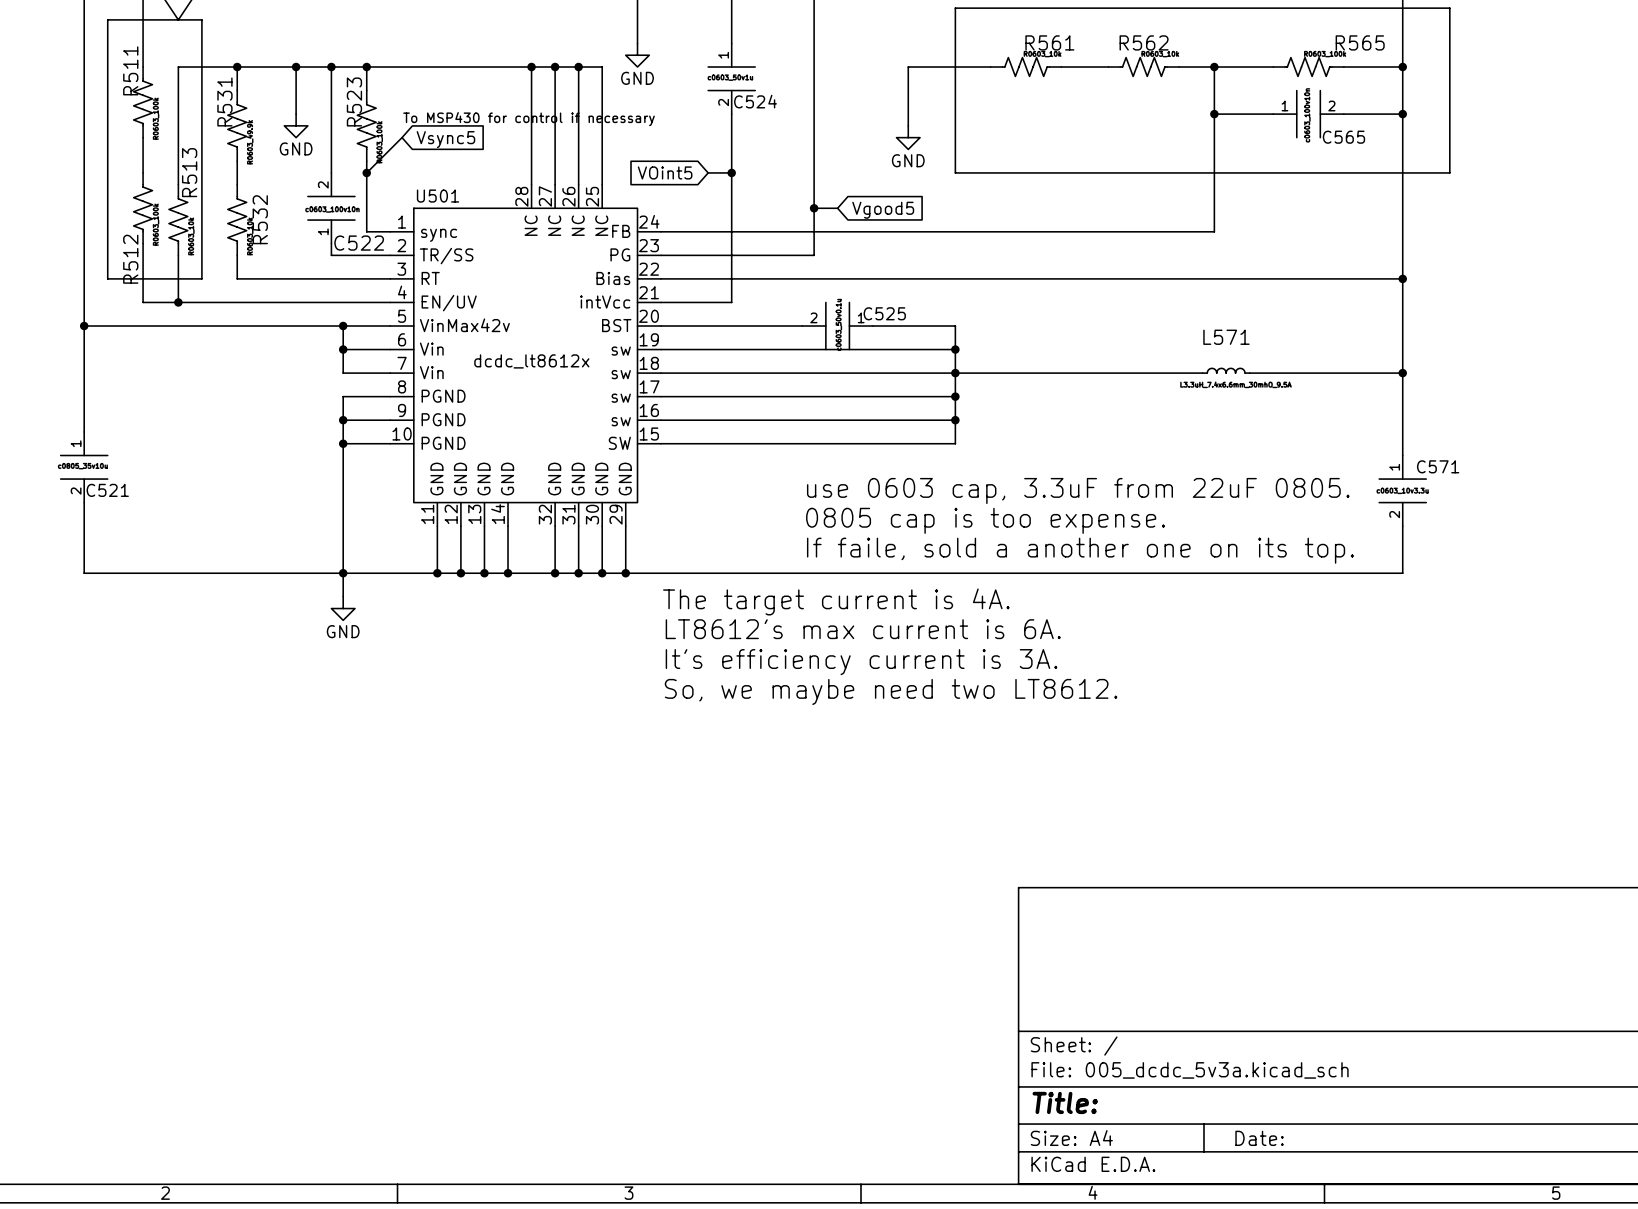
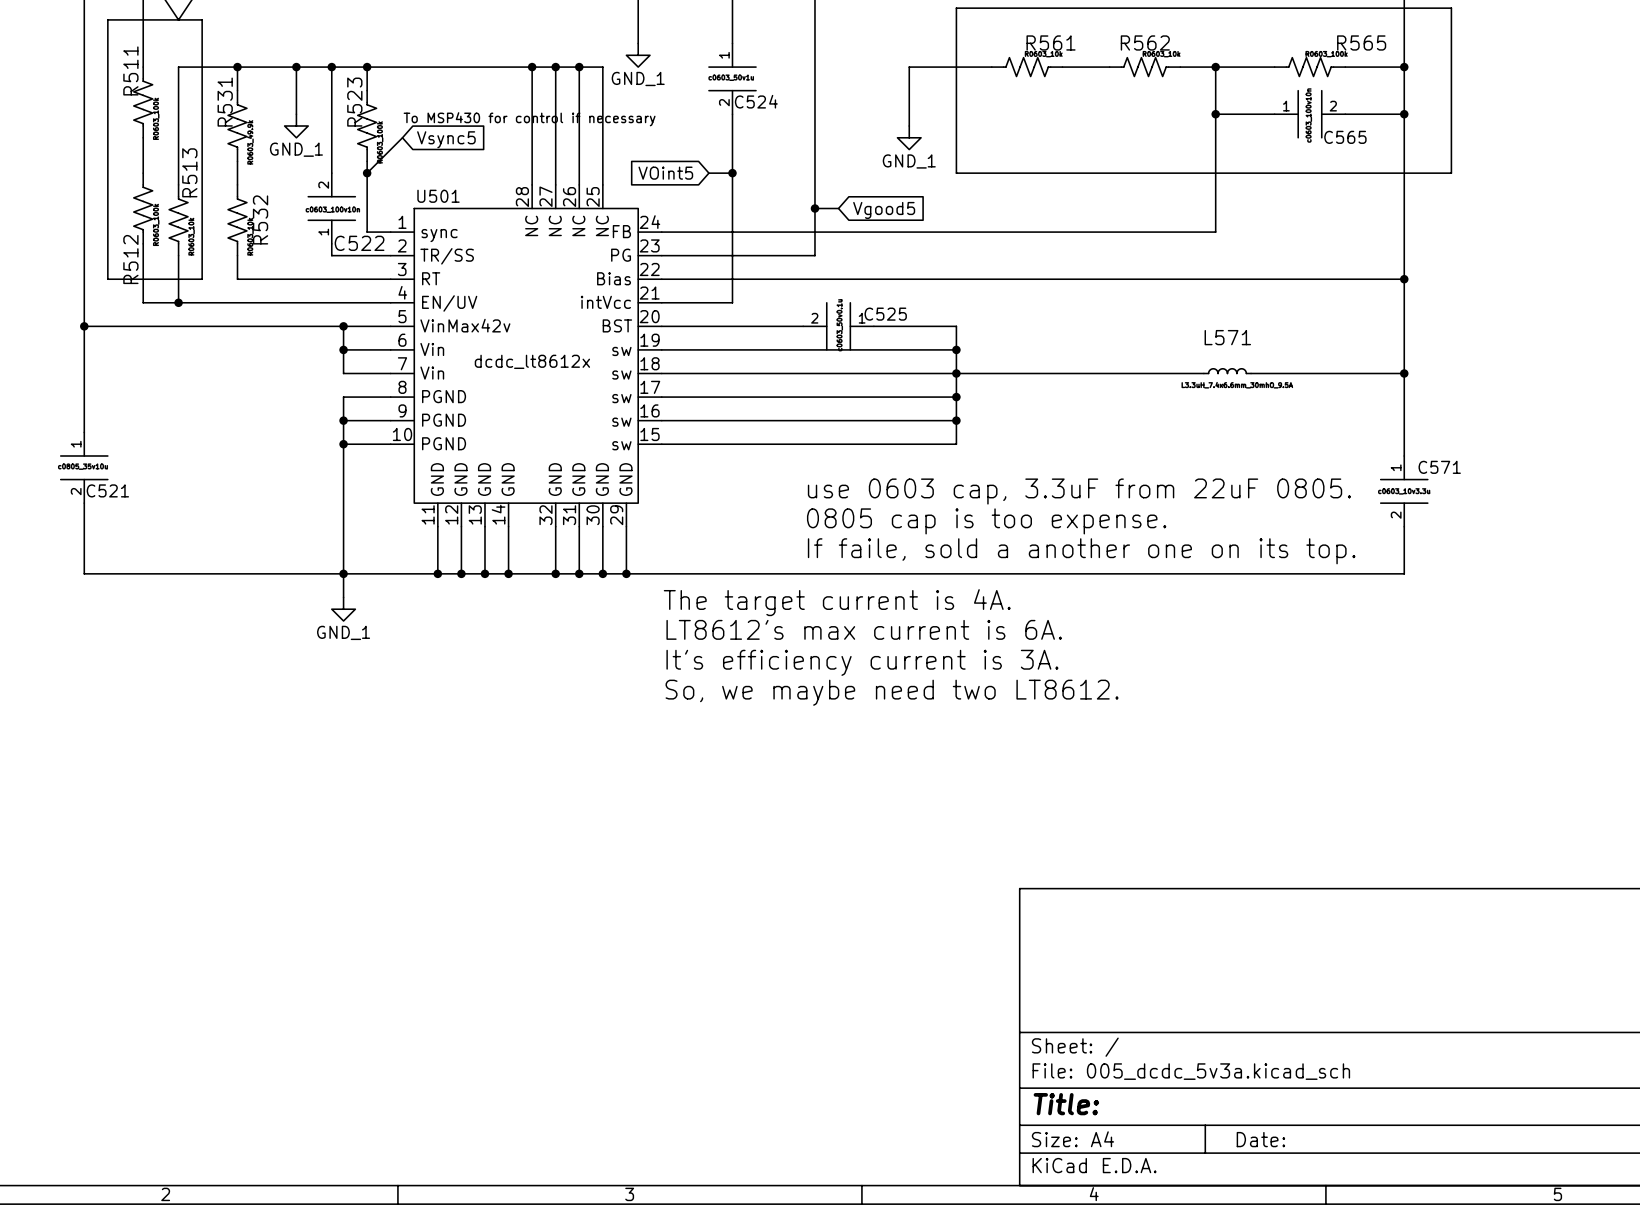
power symbol: GND (637, 55) -> GND_1 (638, 55)
power symbol: GND (296, 125) -> GND_1 (296, 126)
power symbol: GND (908, 137) -> GND_1 (909, 137)
U501 pin name: SW (619, 443) -> sw (621, 445)
power symbol: GND (343, 608) -> GND_1 (343, 609)

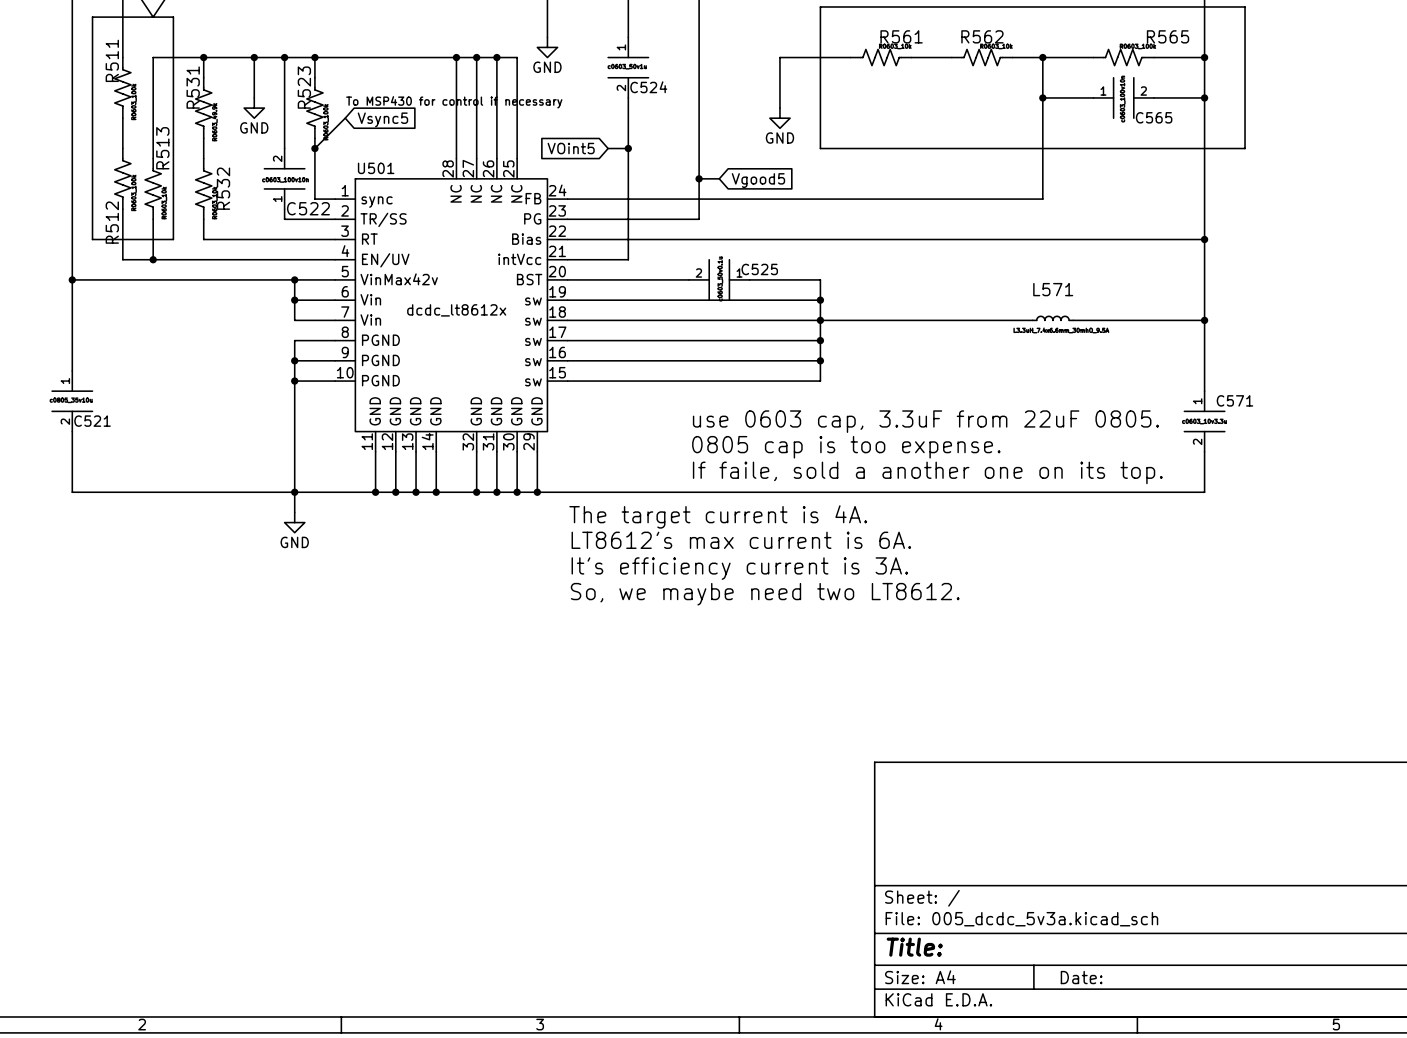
power symbol: GND_1 (638, 55) -> GND (547, 47)
power symbol: GND_1 (296, 126) -> GND (254, 108)
power symbol: GND_1 (909, 137) -> GND (779, 118)
power symbol: GND_1 (343, 609) -> GND (294, 522)

